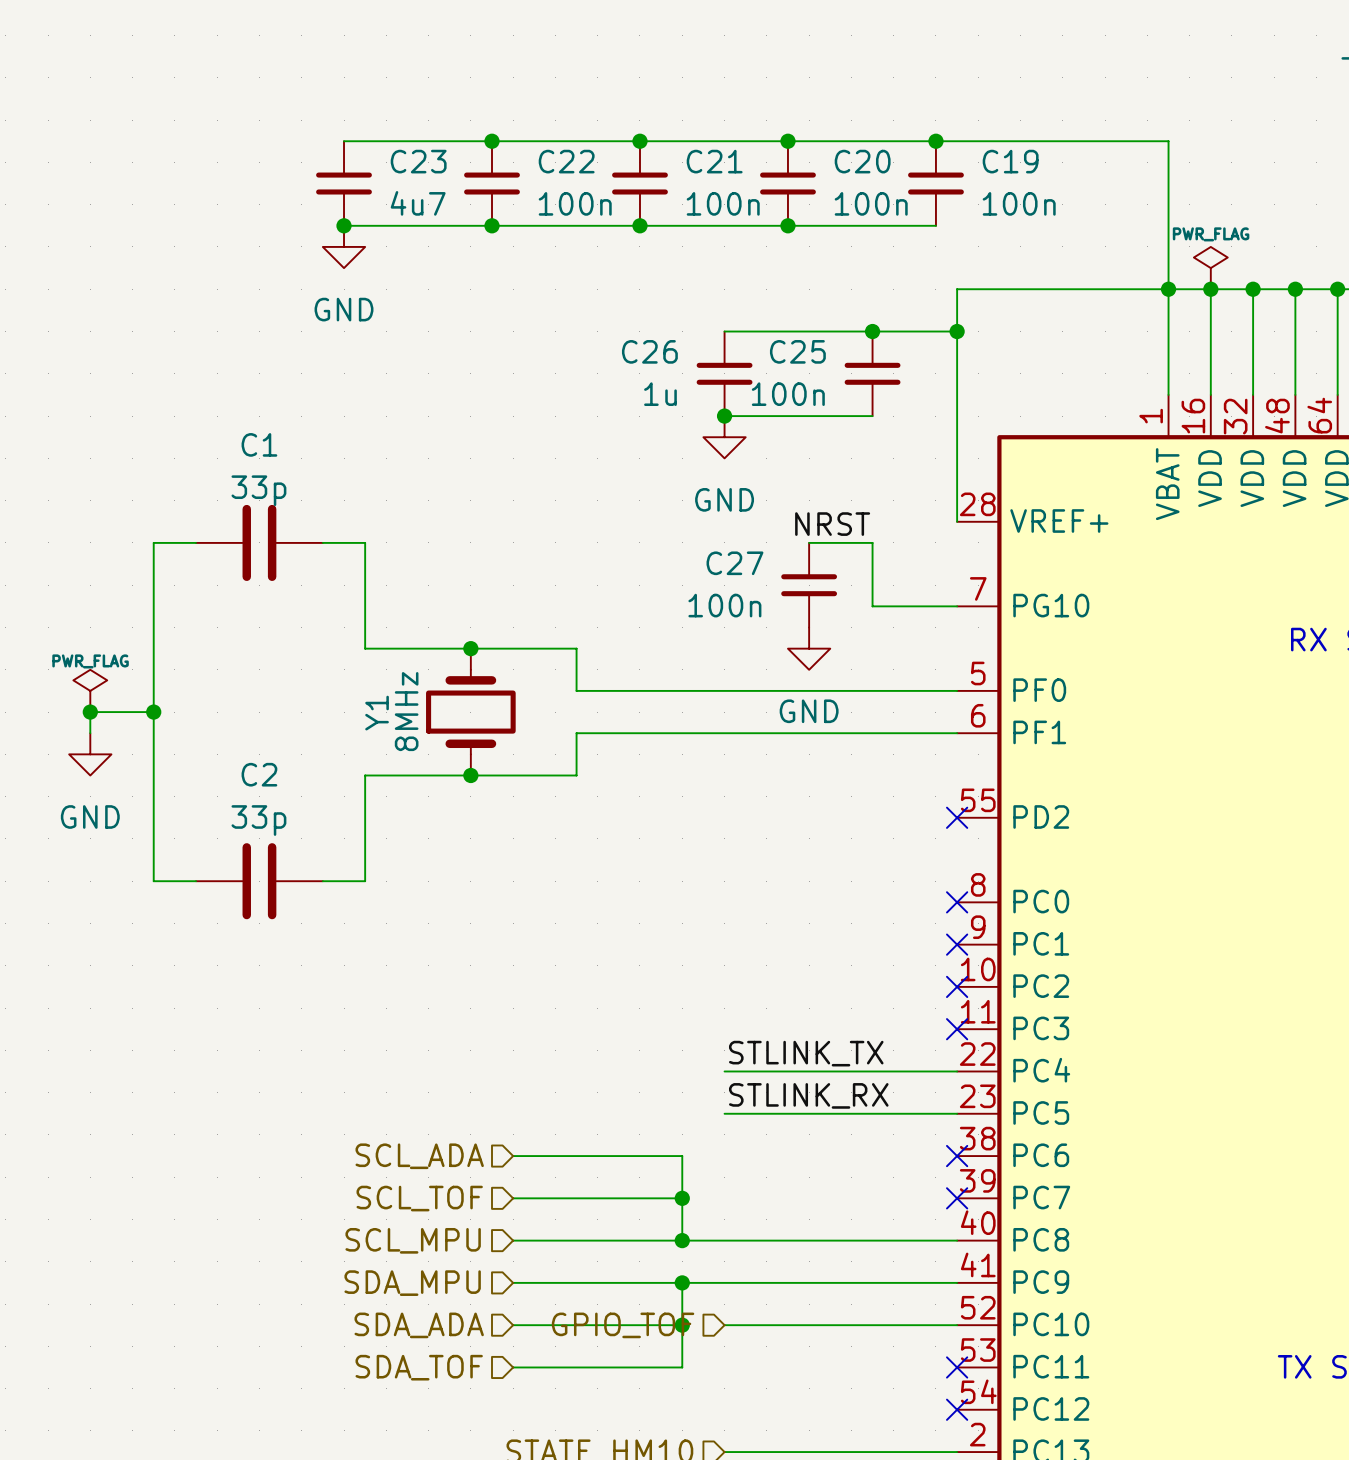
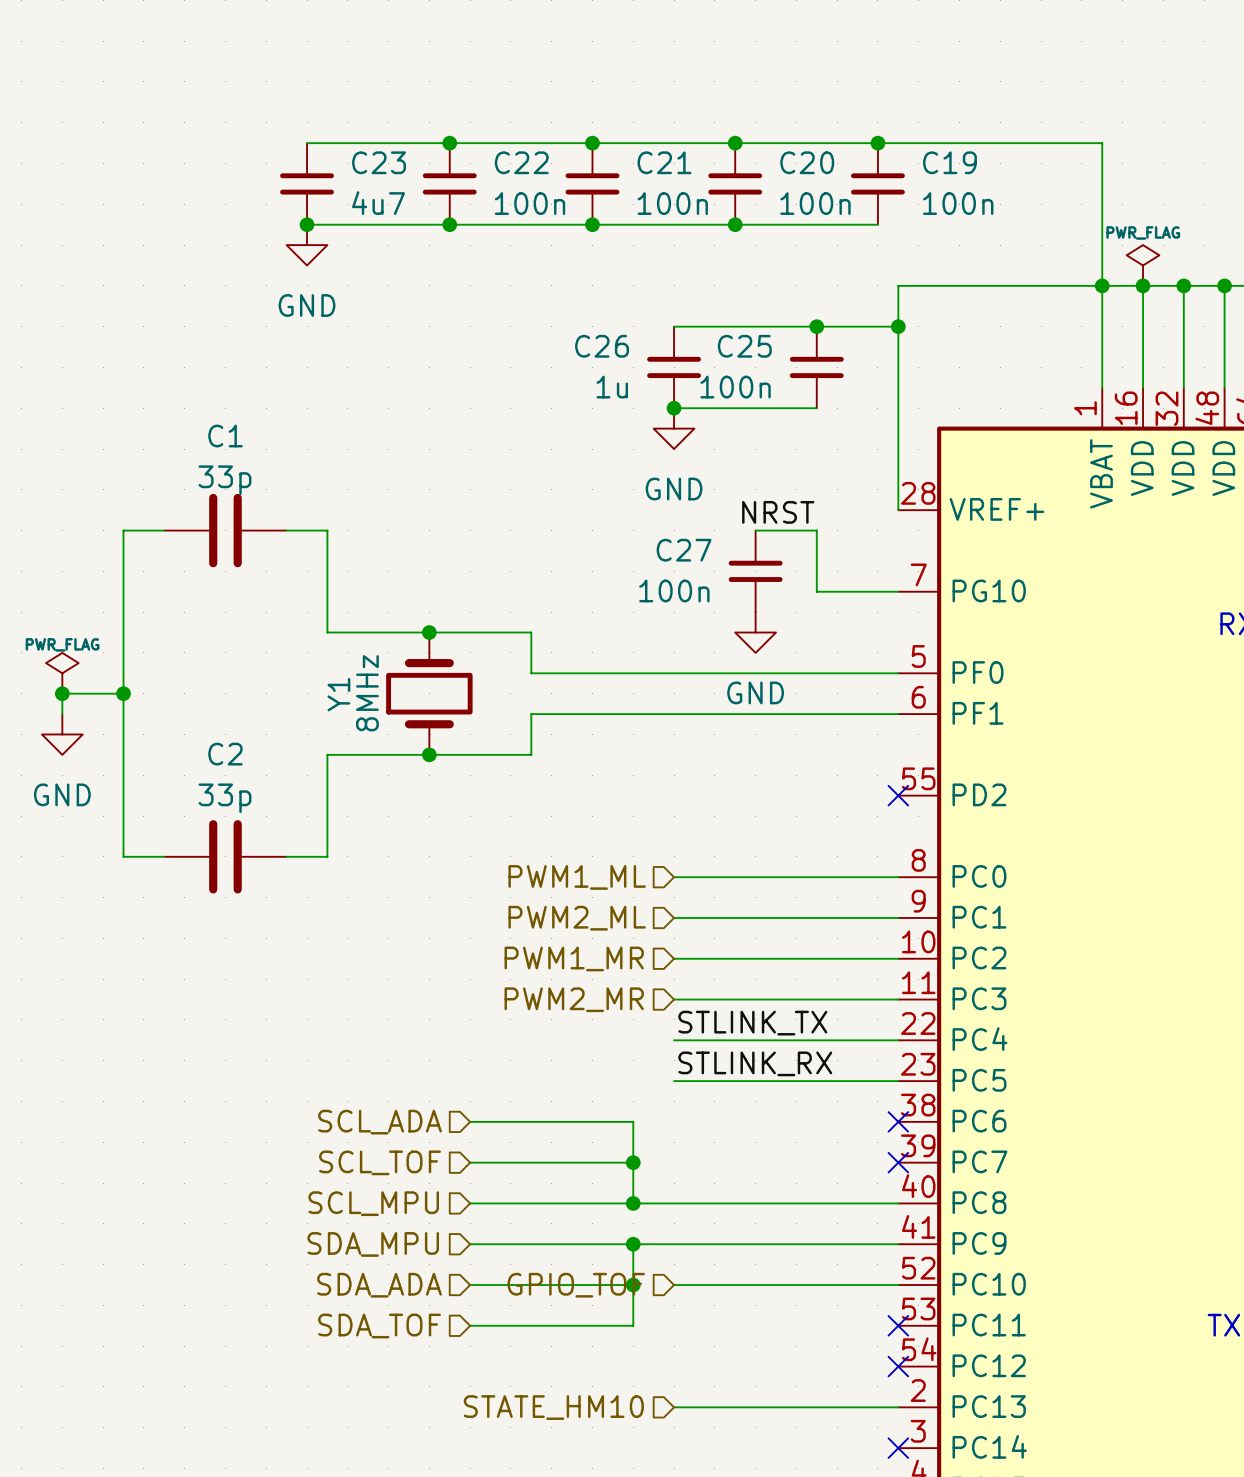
hierarchical label: none -> PWM1_ML (577, 877)
wire: none -> (674, 877) (898, 877)
no-connect mark: (957, 902) -> none
hierarchical label: none -> PWM2_ML (577, 918)
wire: none -> (674, 917) (898, 917)
no-connect mark: (957, 944) -> none
wire: none -> (674, 958) (898, 958)
no-connect mark: (957, 986) -> none
hierarchical label: none -> PWM1_MR (574, 958)
hierarchical label: none -> PWM2_MR (574, 999)
wire: none -> (674, 999) (898, 999)
no-connect mark: (957, 1029) -> none

